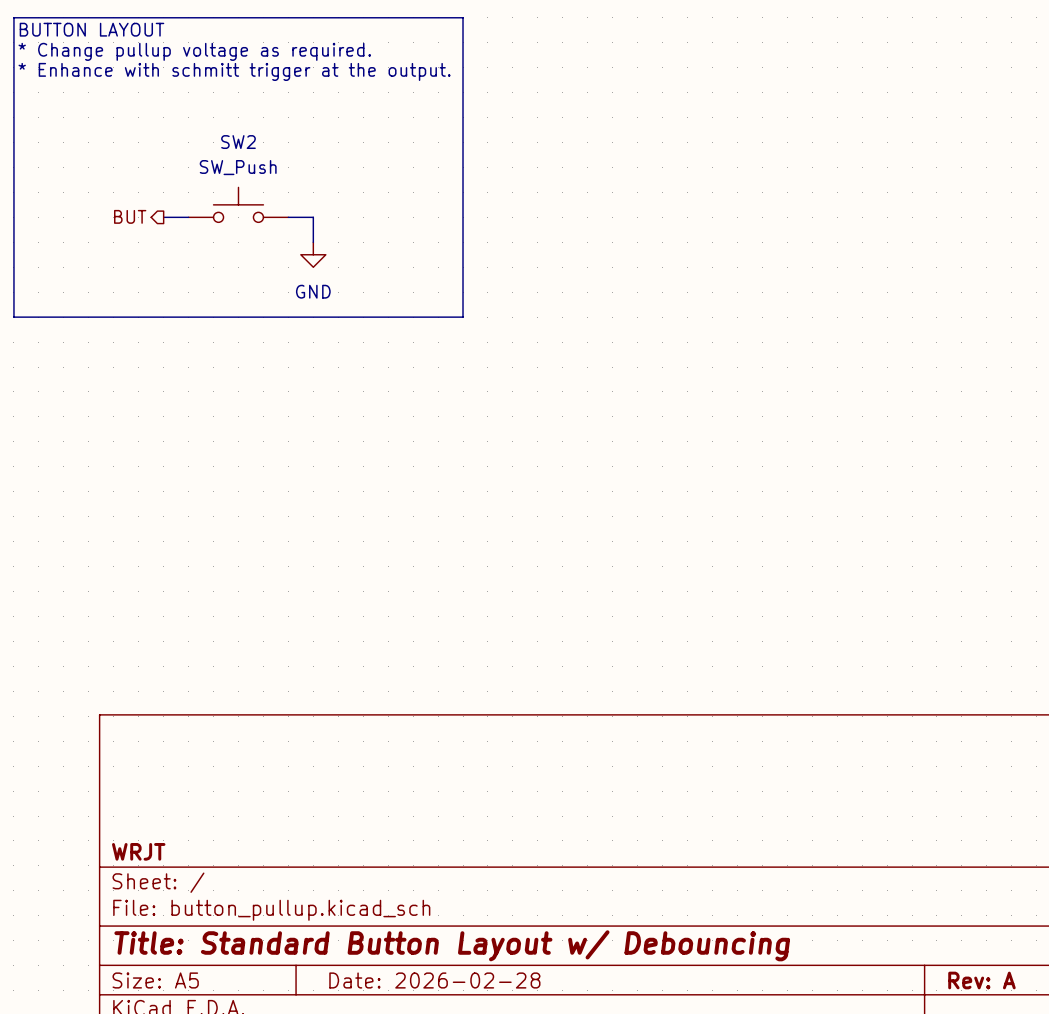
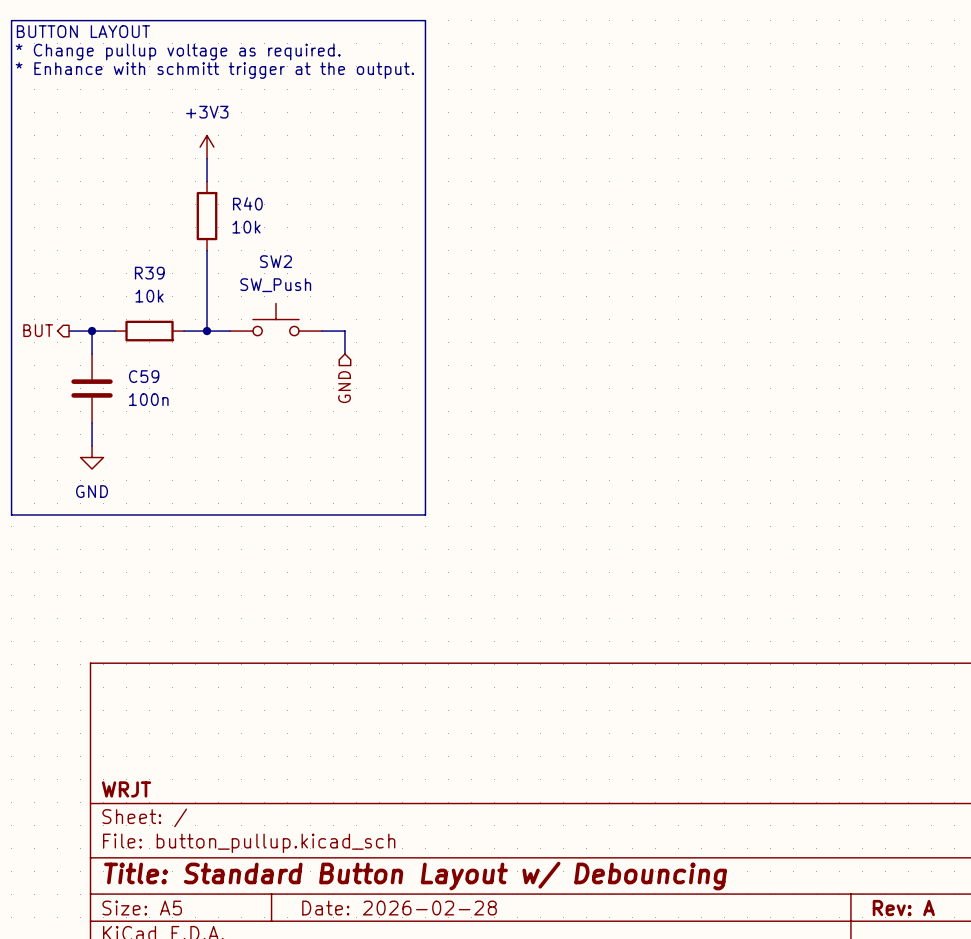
power symbol: none -> +3V3 (207, 147)
wire: none -> (207, 158) (207, 181)
SW2 position: (238, 204) -> (275, 319)
hierarchical label position: BUT (130, 216) -> BUT (38, 330)
wire: (163, 217) (188, 217) -> none
wire: (288, 217) (313, 217) (313, 242) -> (321, 331) (344, 331) (344, 354)
R40: none -> 10k (207, 216)
power symbol: GND (313, 254) -> none
wire: none -> (207, 250) (207, 331)
line: (13, 317) (463, 317) -> (11, 296) (11, 515) (425, 515) (425, 296)
wire: none -> (69, 331) (115, 331)
wire: none -> (92, 331) (92, 354)
junction: none -> (92, 331)
R39: none -> 10k (149, 331)
wire: none -> (184, 331) (230, 331)
junction: none -> (207, 331)
hierarchical label: none -> GND (344, 387)
C59: none -> 100n (92, 388)
wire: none -> (92, 423) (92, 446)
power symbol: none -> GND (92, 457)

